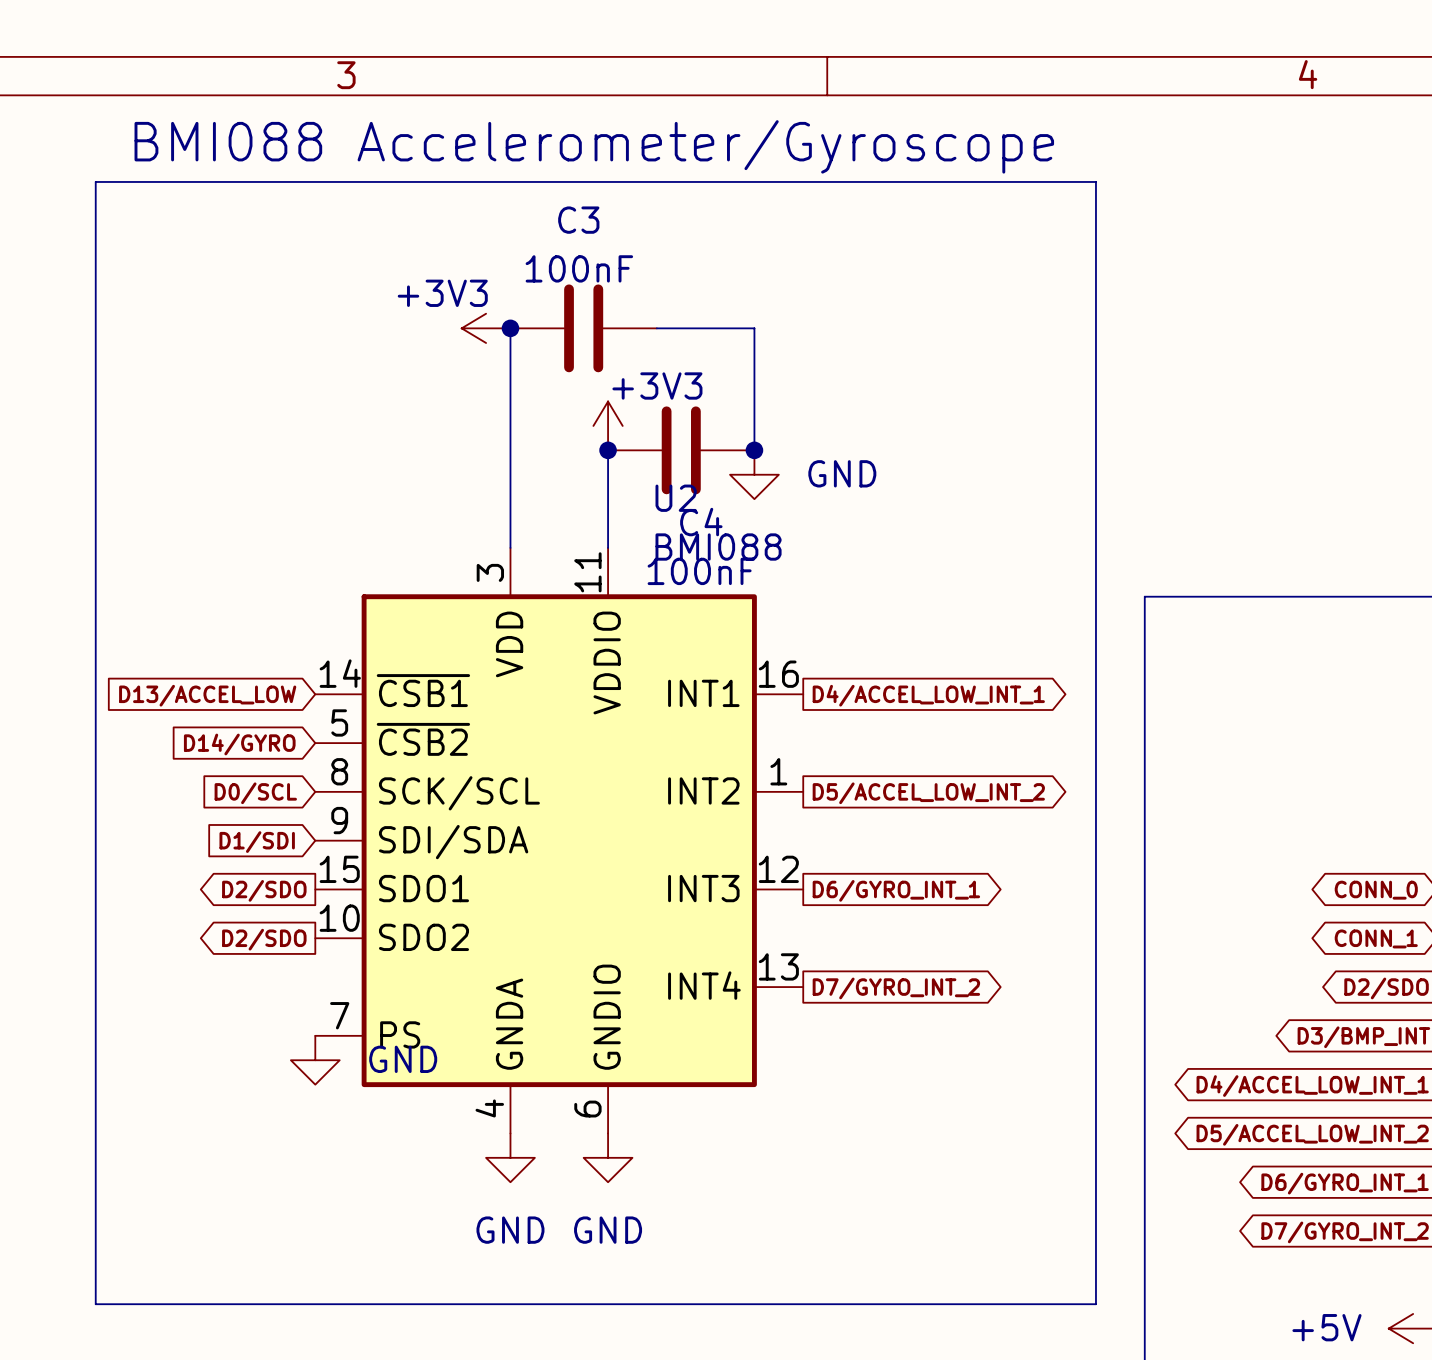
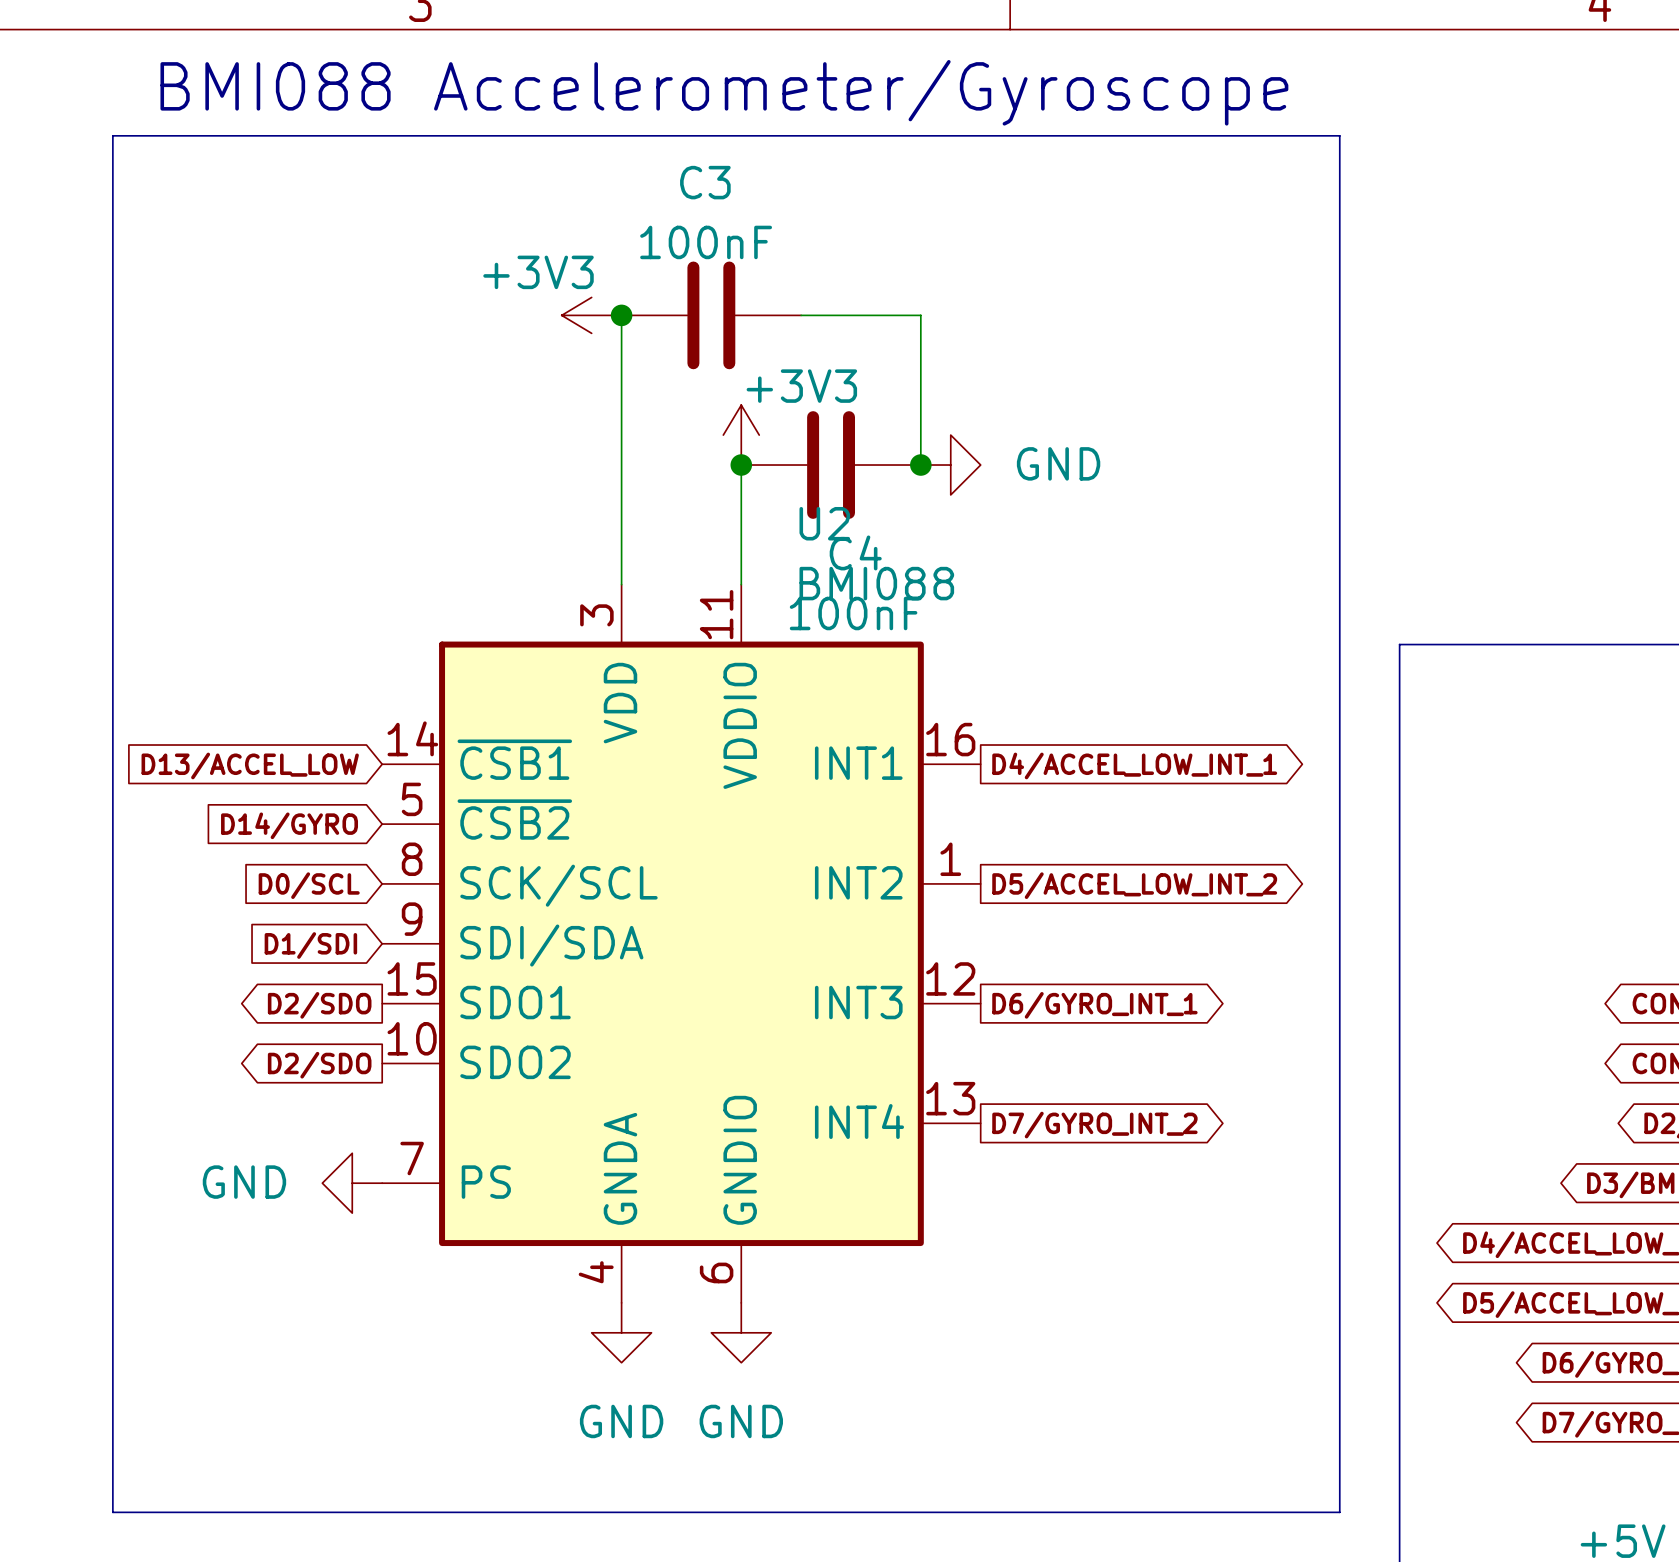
power symbol rotation: 0° (754, 474) -> 90° counterclockwise (950, 465)
power symbol position: GND (754, 474) -> GND (950, 465)
power symbol text position: GND (403, 1059) -> GND (244, 1182)
power symbol rotation: 0° (315, 1060) -> 90° clockwise (352, 1183)
power symbol position: GND (315, 1060) -> GND (352, 1183)

